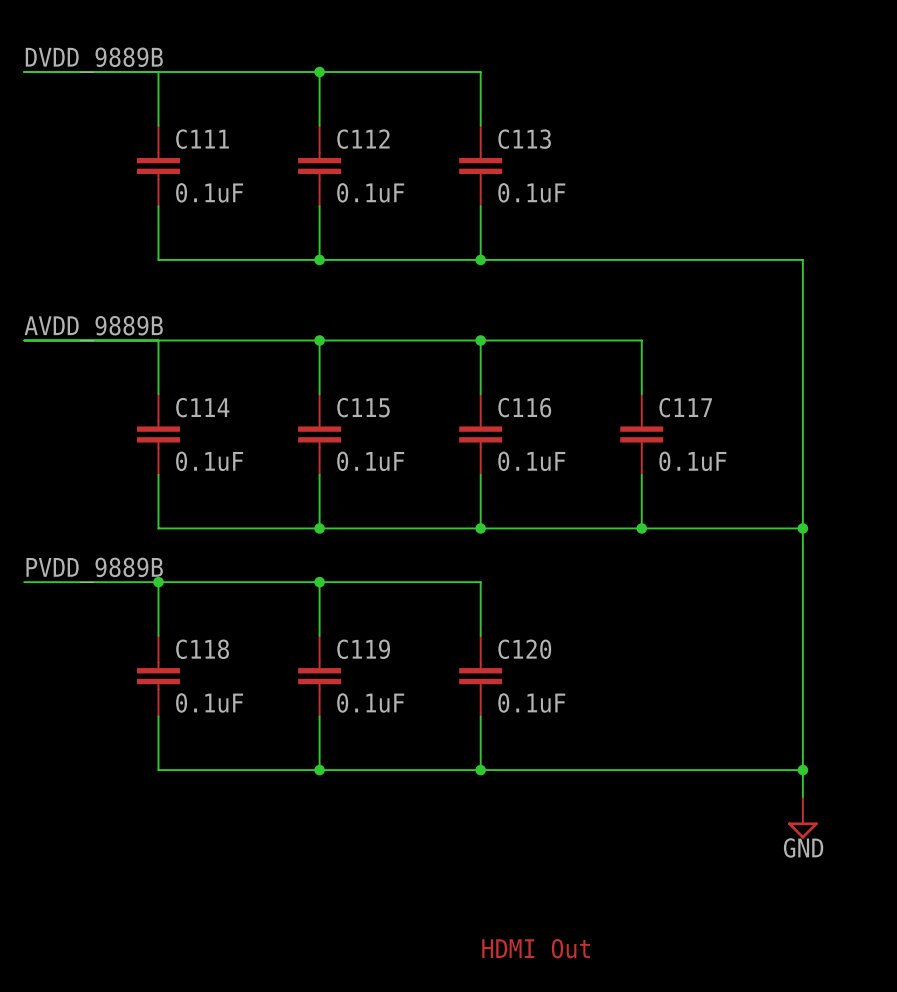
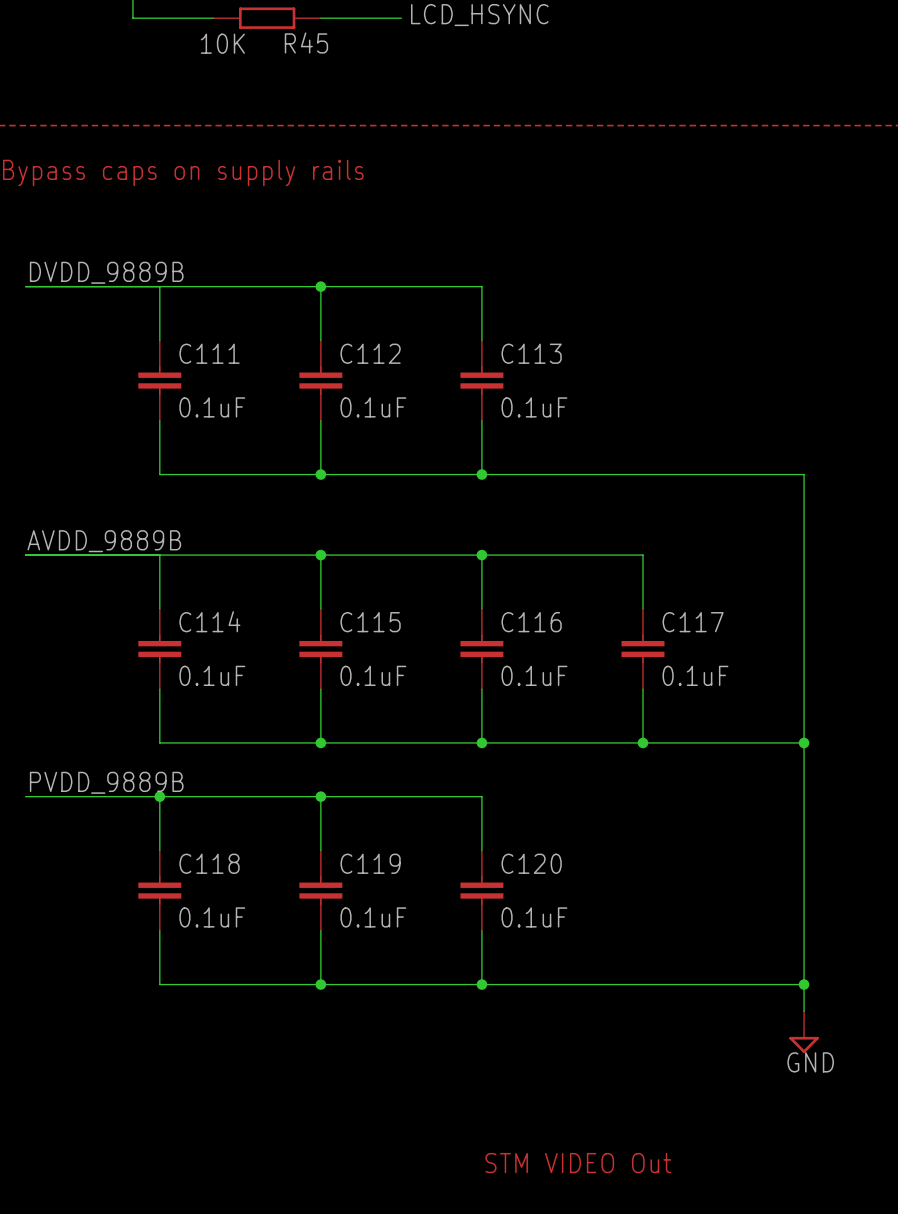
text: HDMI Out (536, 948) -> STM VIDEO Out (578, 1163)

